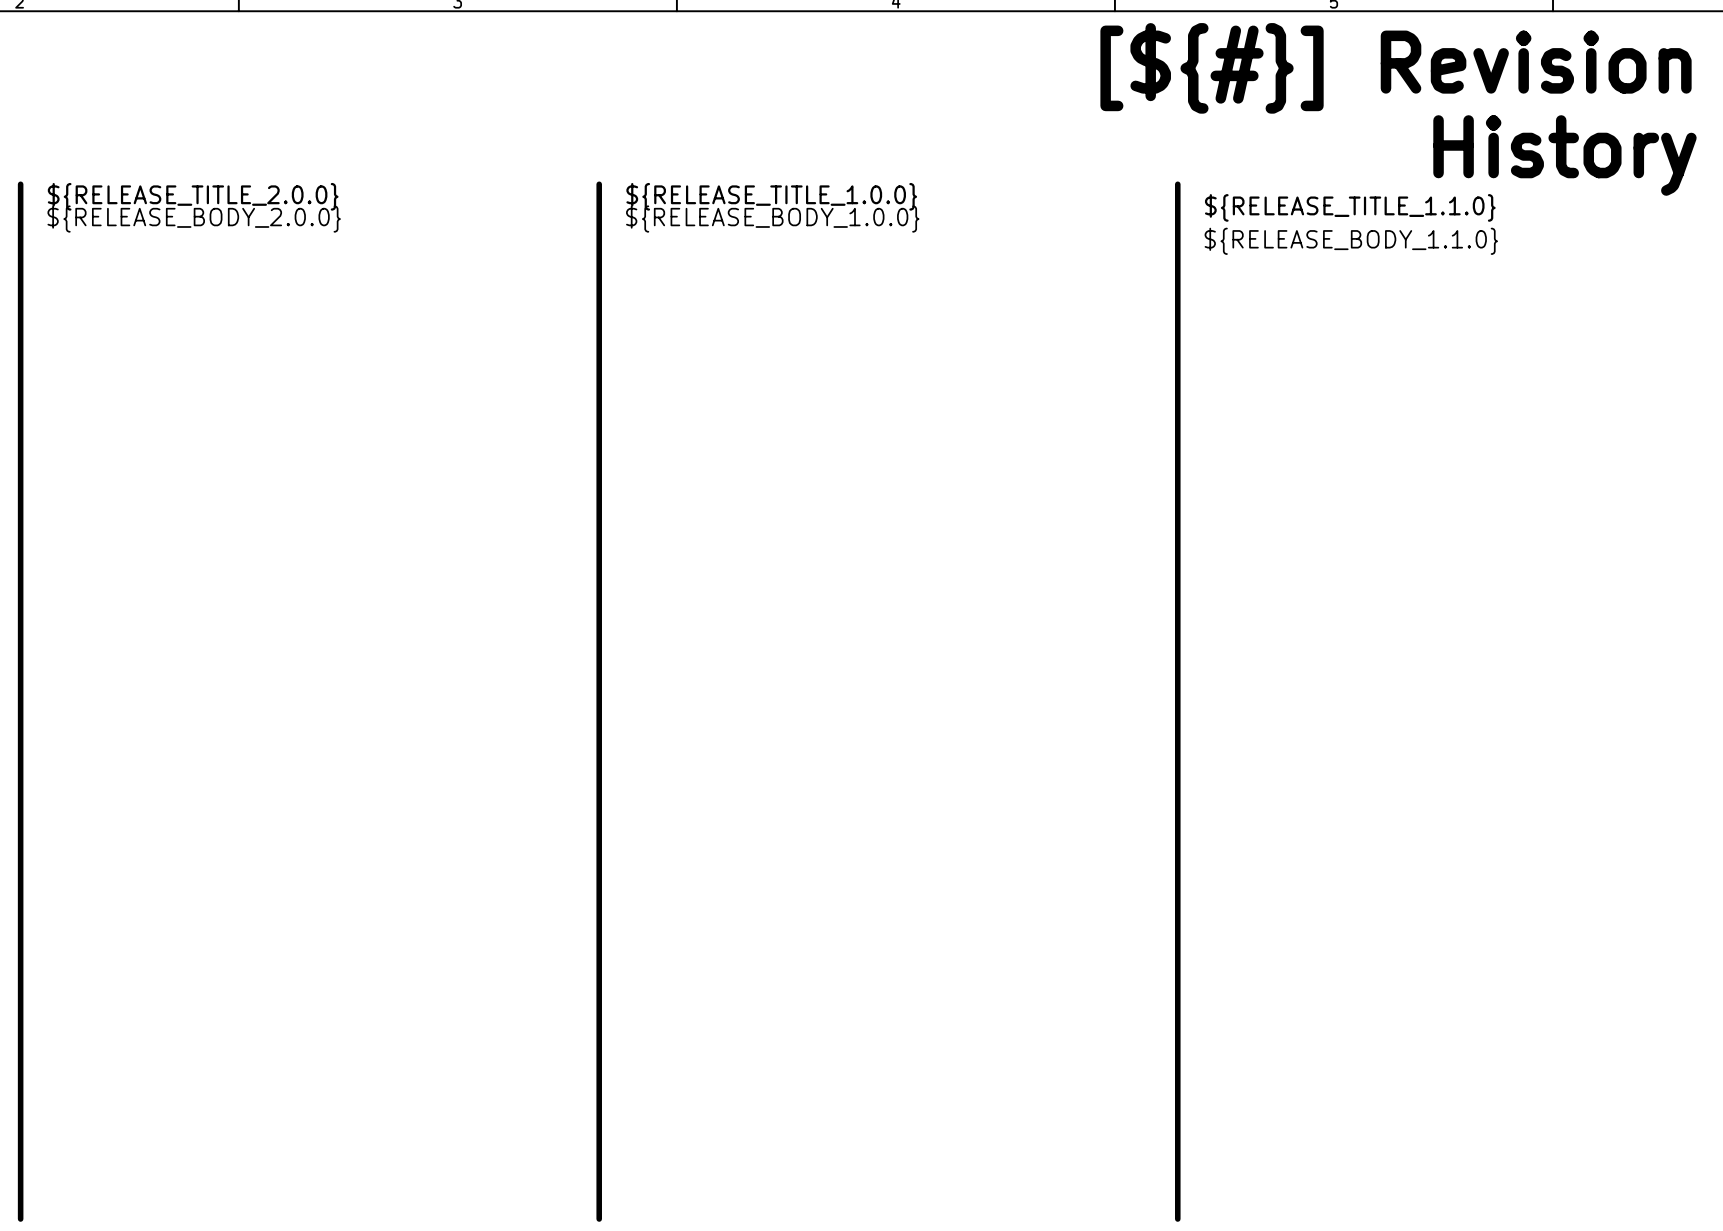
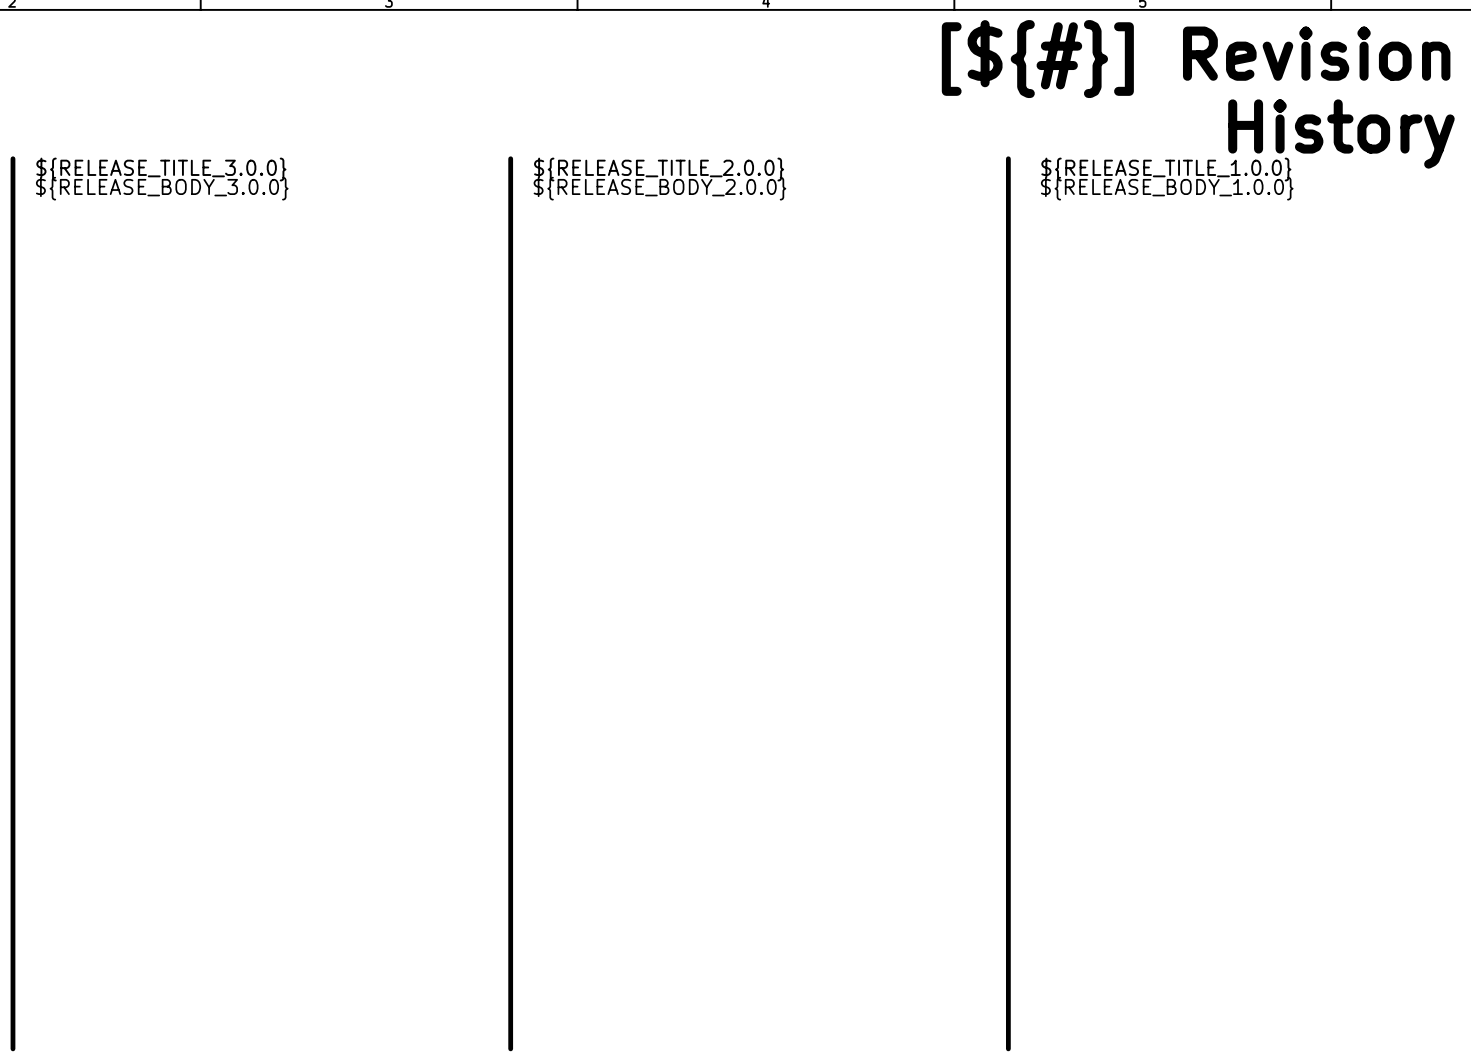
text: ${RELEASE_TITLE_2.0.0} (193, 196) -> ${RELEASE_TITLE_3.0.0} (161, 169)
text: ${RELEASE_TITLE_1.0.0} (771, 196) -> ${RELEASE_TITLE_2.0.0} (659, 169)
text: none -> ${RELEASE_TITLE_1.0.0} (1166, 169)
text: ${RELEASE_TITLE_1.1.0} (1350, 207) -> none
text: ${RELEASE_BODY_2.0.0} (194, 219) -> ${RELEASE_BODY_3.0.0} (162, 188)
text: ${RELEASE_BODY_1.0.0} (772, 219) -> ${RELEASE_BODY_2.0.0} (659, 188)
text: none -> ${RELEASE_BODY_1.0.0} (1167, 188)
text: ${RELEASE_BODY_1.1.0} (1351, 241) -> none

